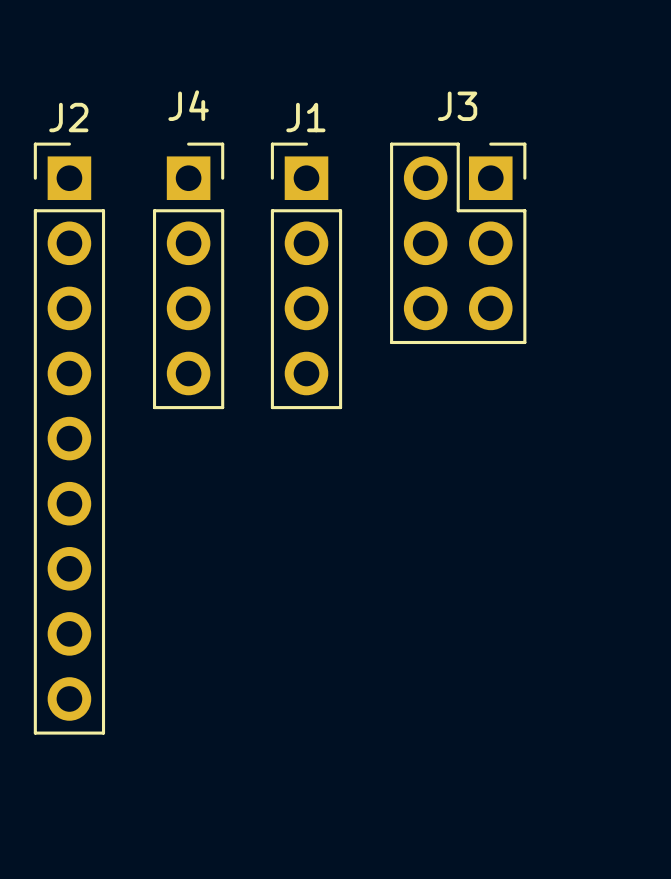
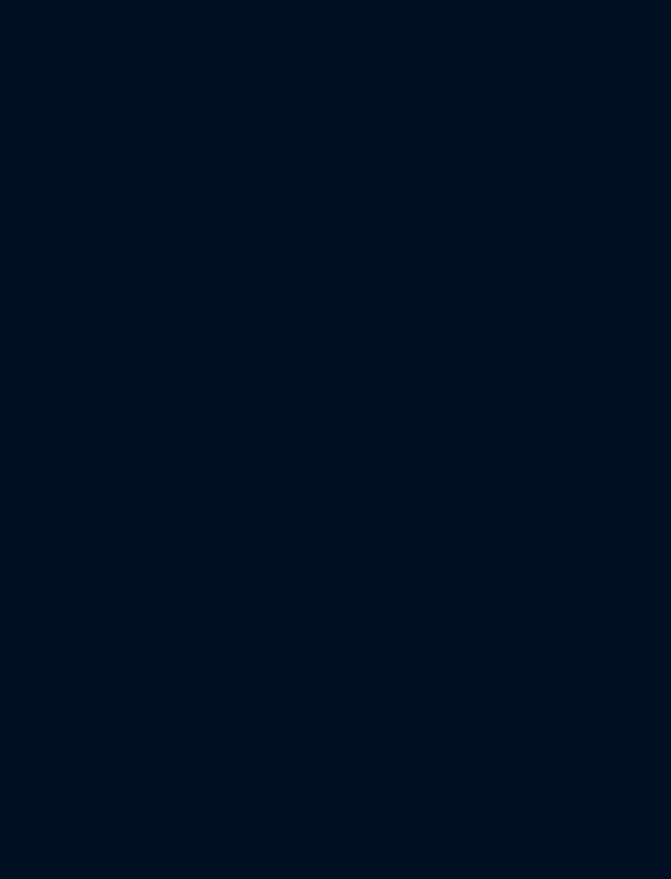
J3: (458, 243) -> none
J4: (188, 275) -> none
J1: (306, 275) -> none
J2: (69, 438) -> none

